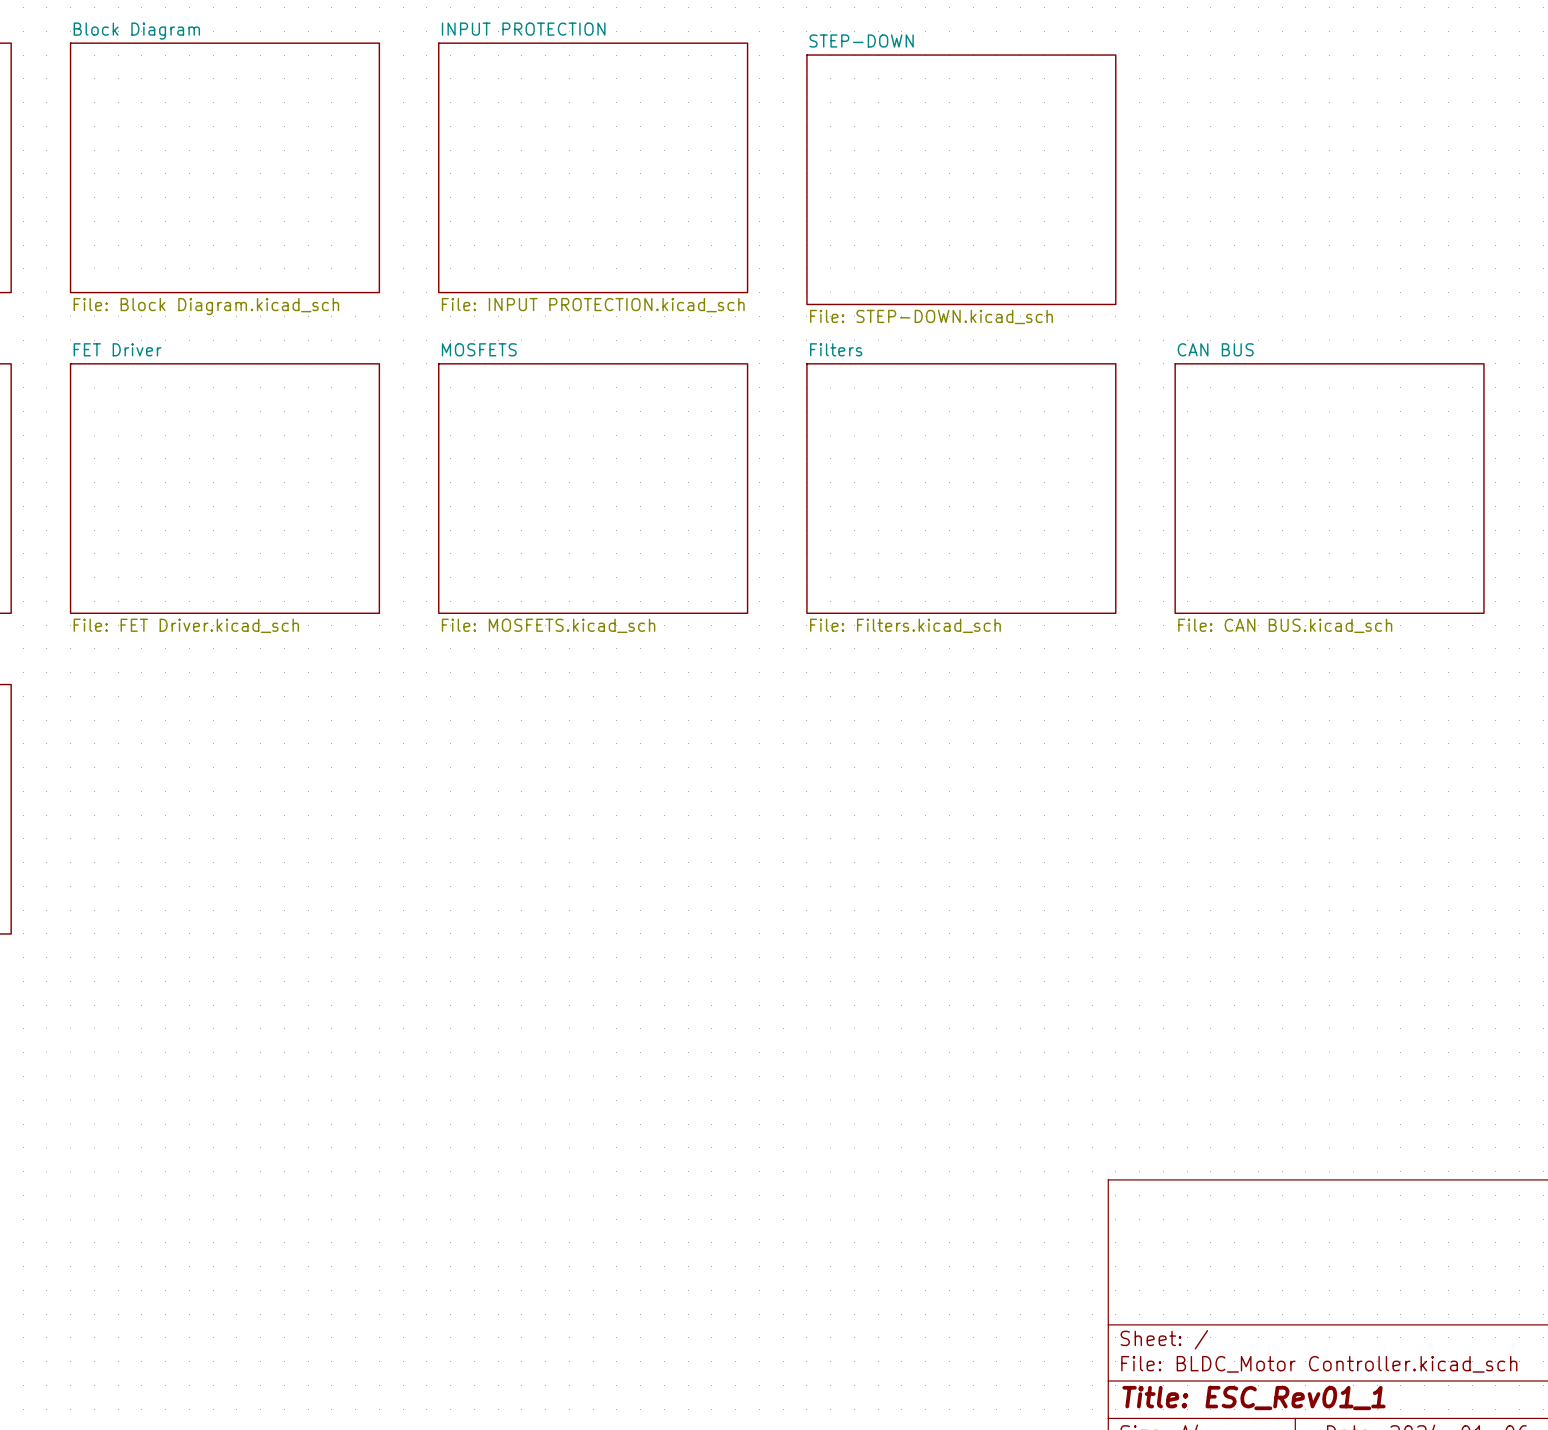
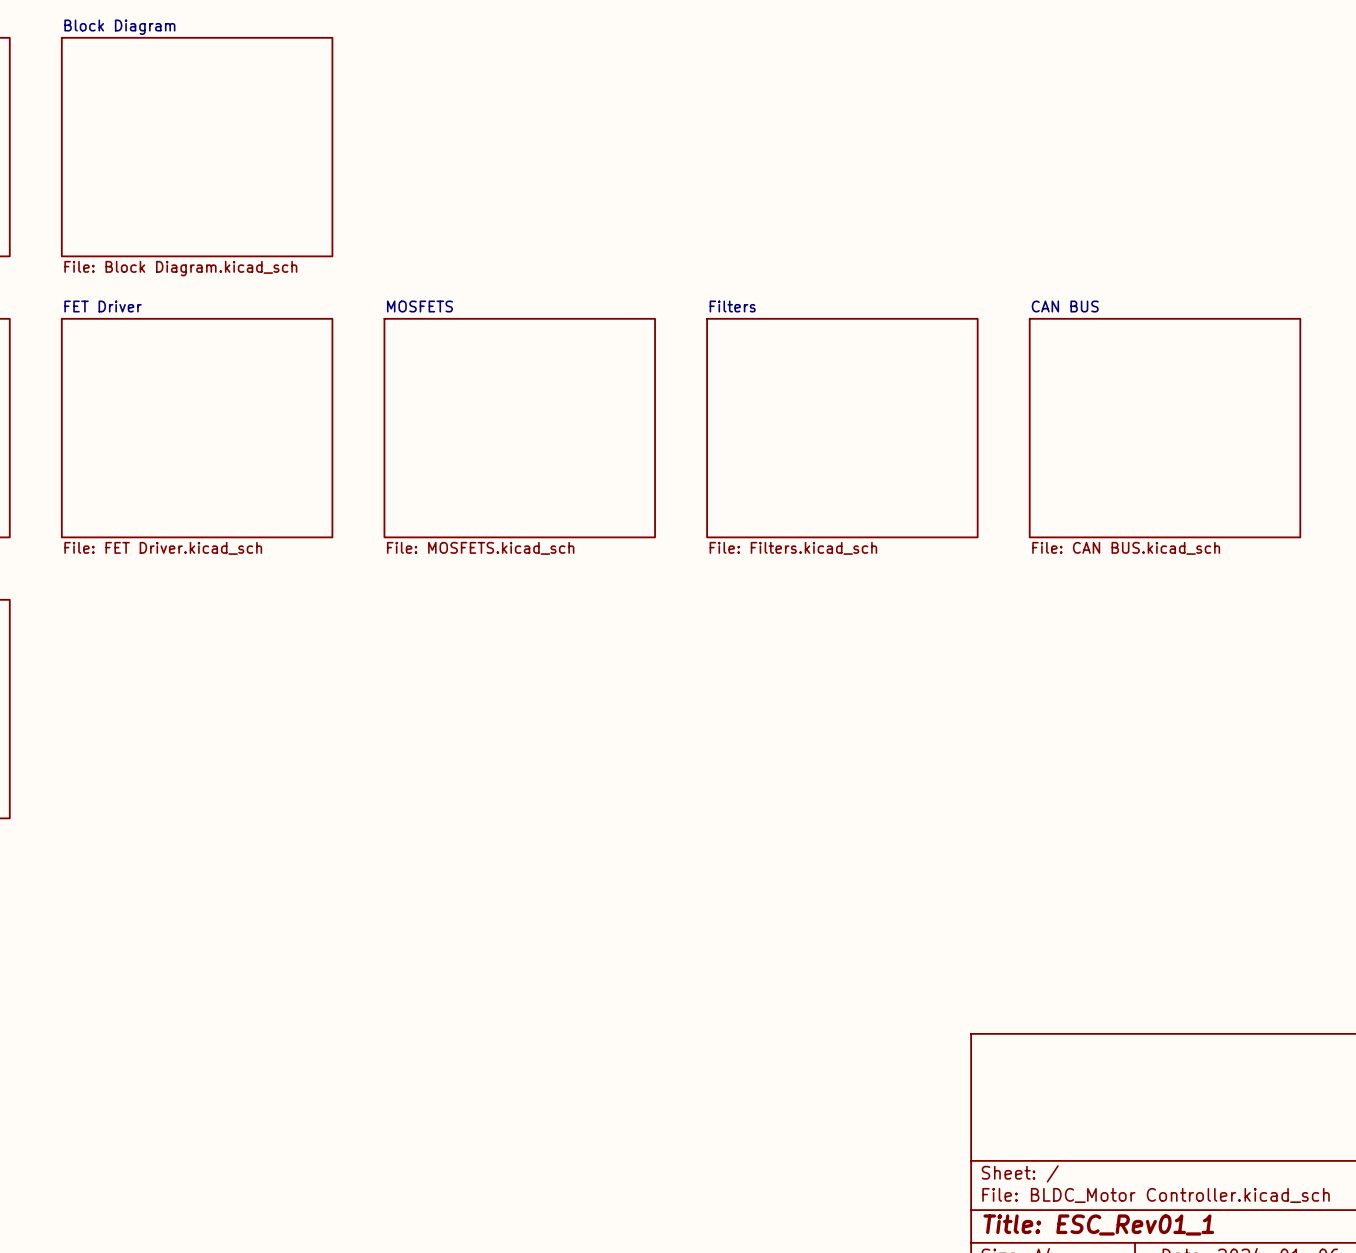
sheet INPUT PROTECTION: File: INPUT PROTECTION.kicad_sch (593, 167) -> none
sheet STEP-DOWN: File: STEP-DOWN.kicad_sch (961, 179) -> none

